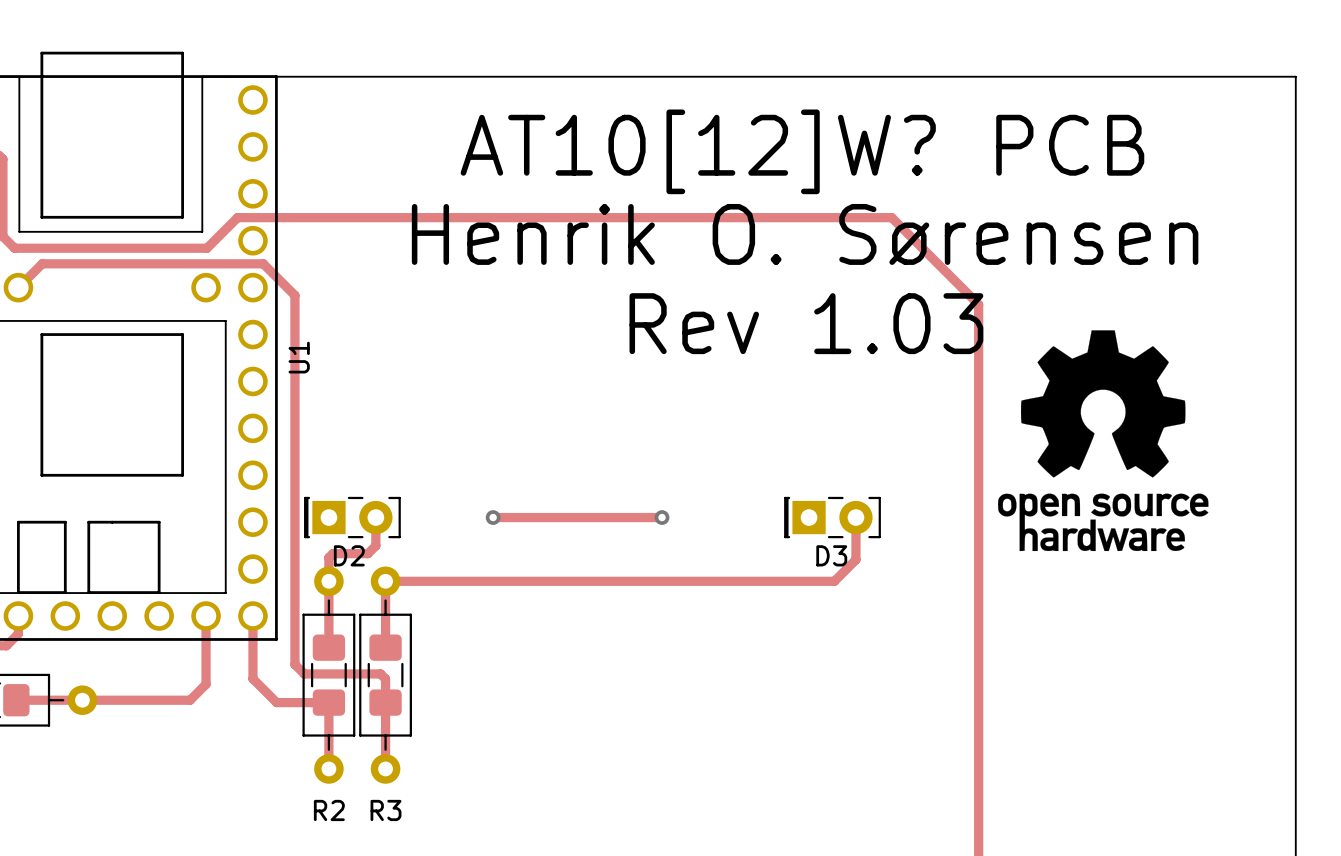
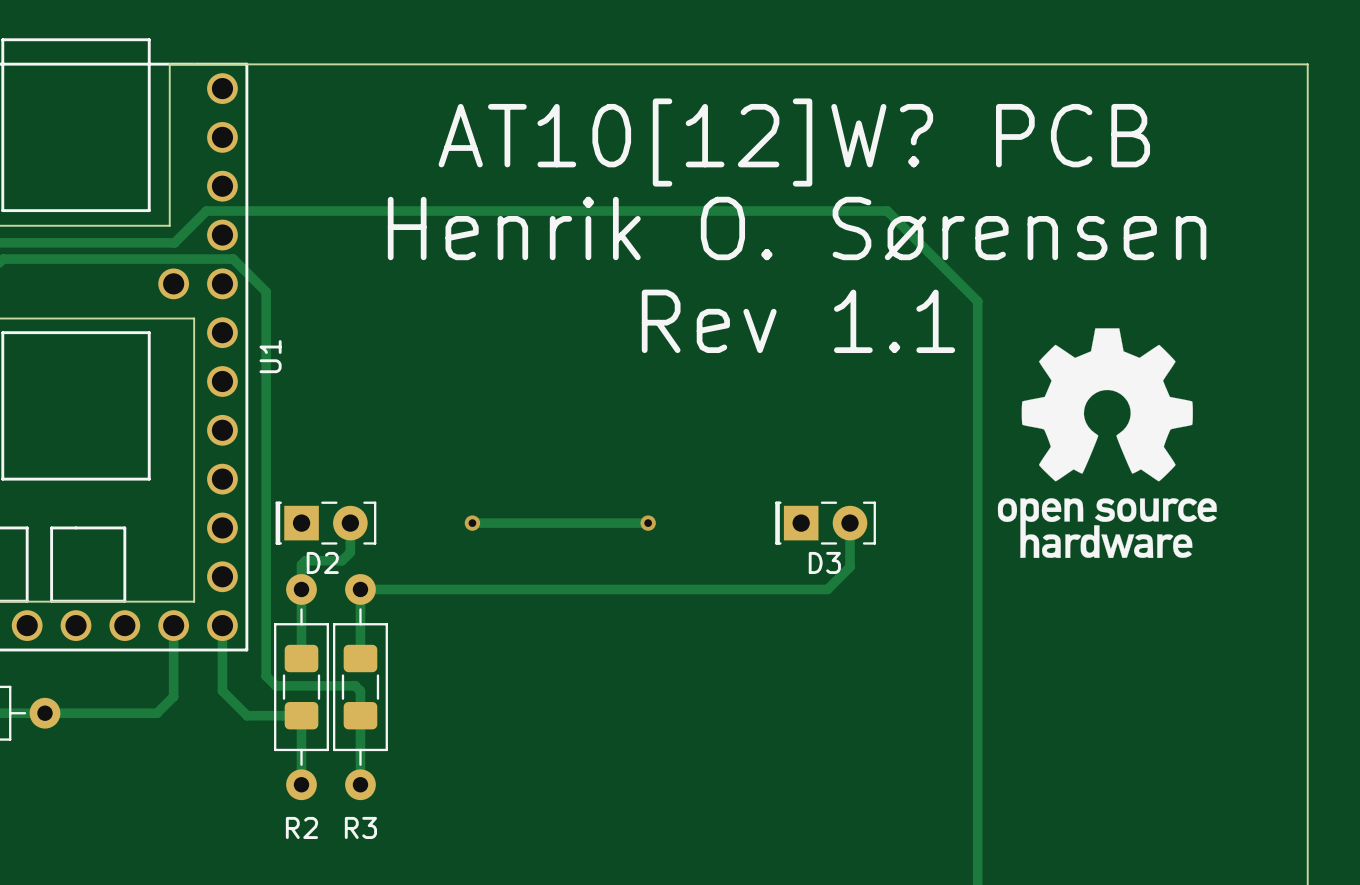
text: Rev 1.03 (806, 323) -> Rev 1.1 (798, 321)

